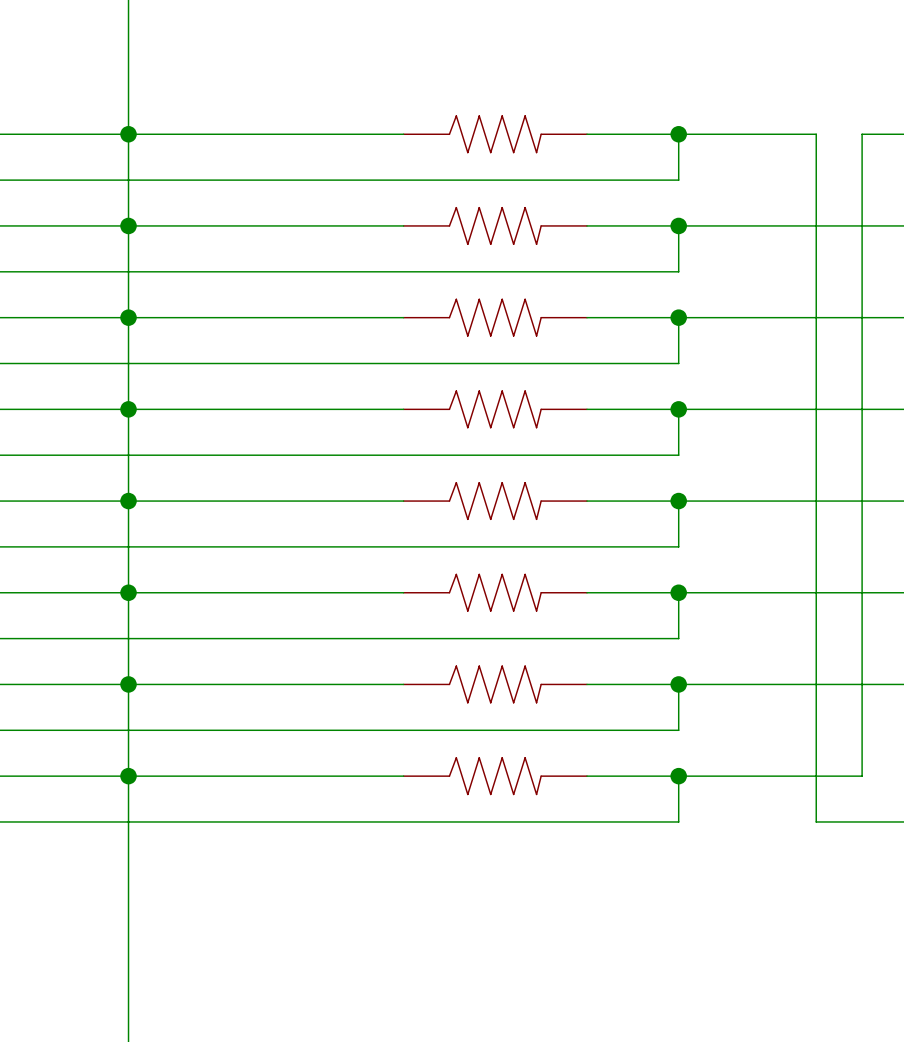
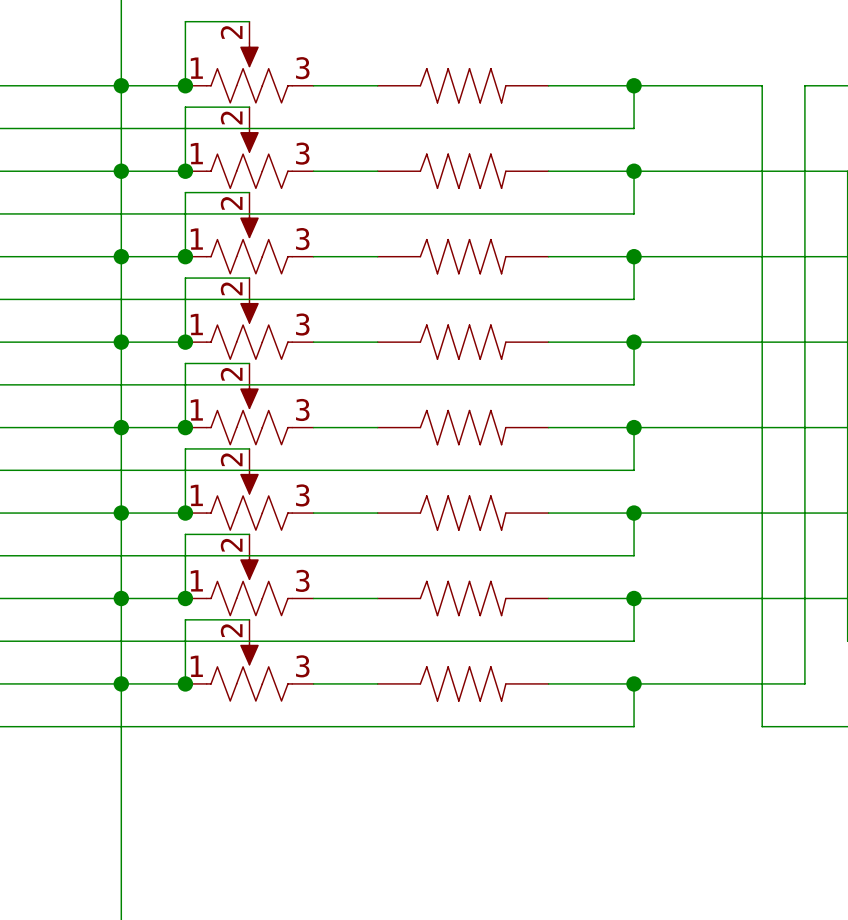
part: none -> (249, 62)
wire: (197, 134) (334, 134) -> (185, 85) (185, 21) (249, 21)
junction: none -> (185, 85)
part: none -> (249, 147)
wire: (197, 225) (334, 225) -> (185, 171) (185, 107) (249, 107)
junction: none -> (185, 171)
part: none -> (249, 233)
wire: (197, 317) (334, 317) -> (185, 256) (185, 192) (249, 192)
junction: none -> (185, 256)
part: none -> (249, 318)
wire: (197, 409) (334, 409) -> (185, 342) (185, 278) (249, 278)
junction: none -> (185, 342)
part: none -> (249, 404)
wire: (197, 501) (334, 501) -> (185, 427) (185, 363) (249, 363)
junction: none -> (185, 427)
part: none -> (249, 489)
wire: (197, 592) (334, 592) -> (185, 513) (185, 448) (249, 448)
junction: none -> (185, 513)
part: none -> (249, 574)
wire: (197, 684) (334, 684) -> (185, 598) (185, 534) (249, 534)
junction: none -> (185, 598)
part: none -> (249, 660)
wire: (197, 776) (334, 776) -> (185, 683) (185, 619) (249, 619)
junction: none -> (185, 683)

